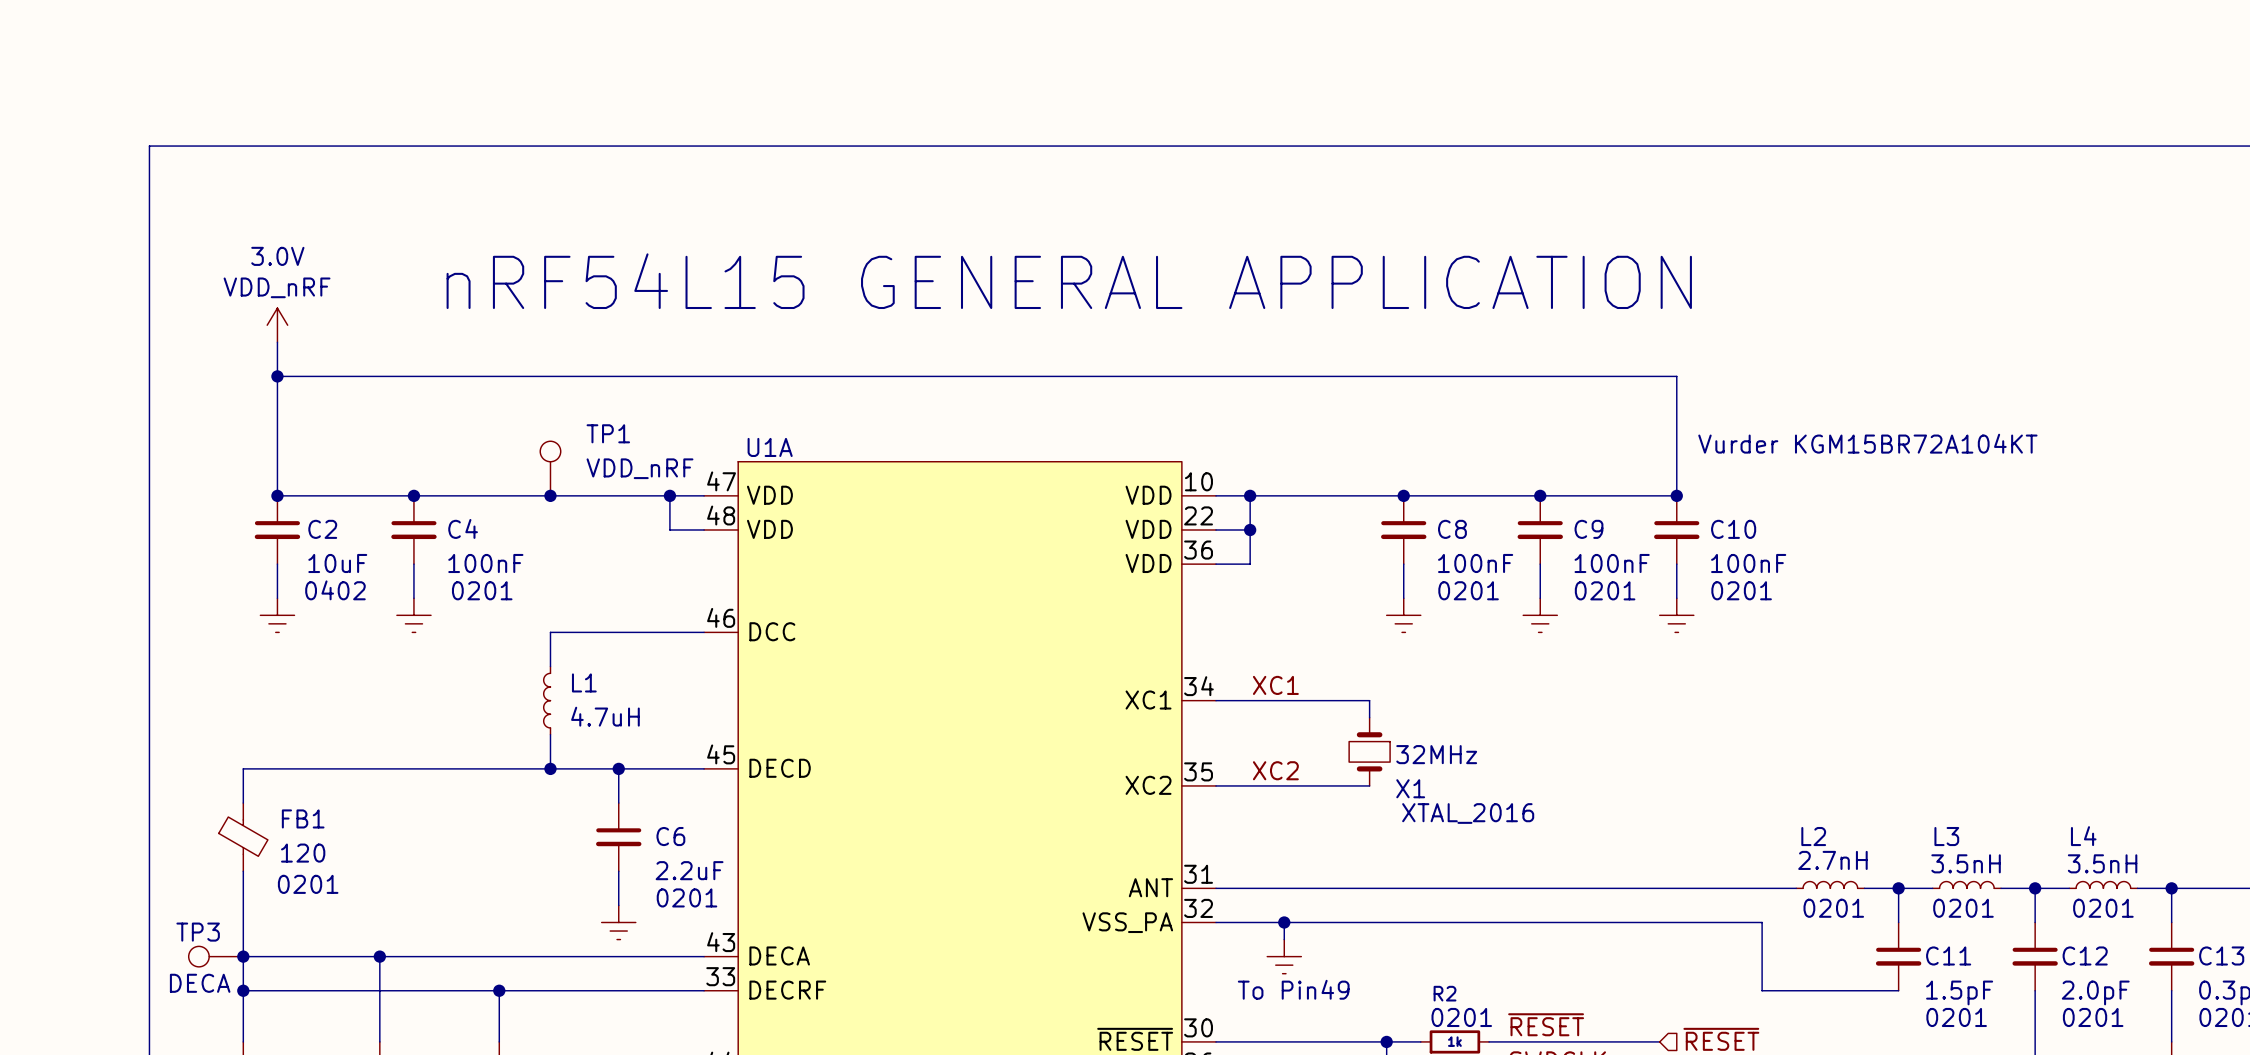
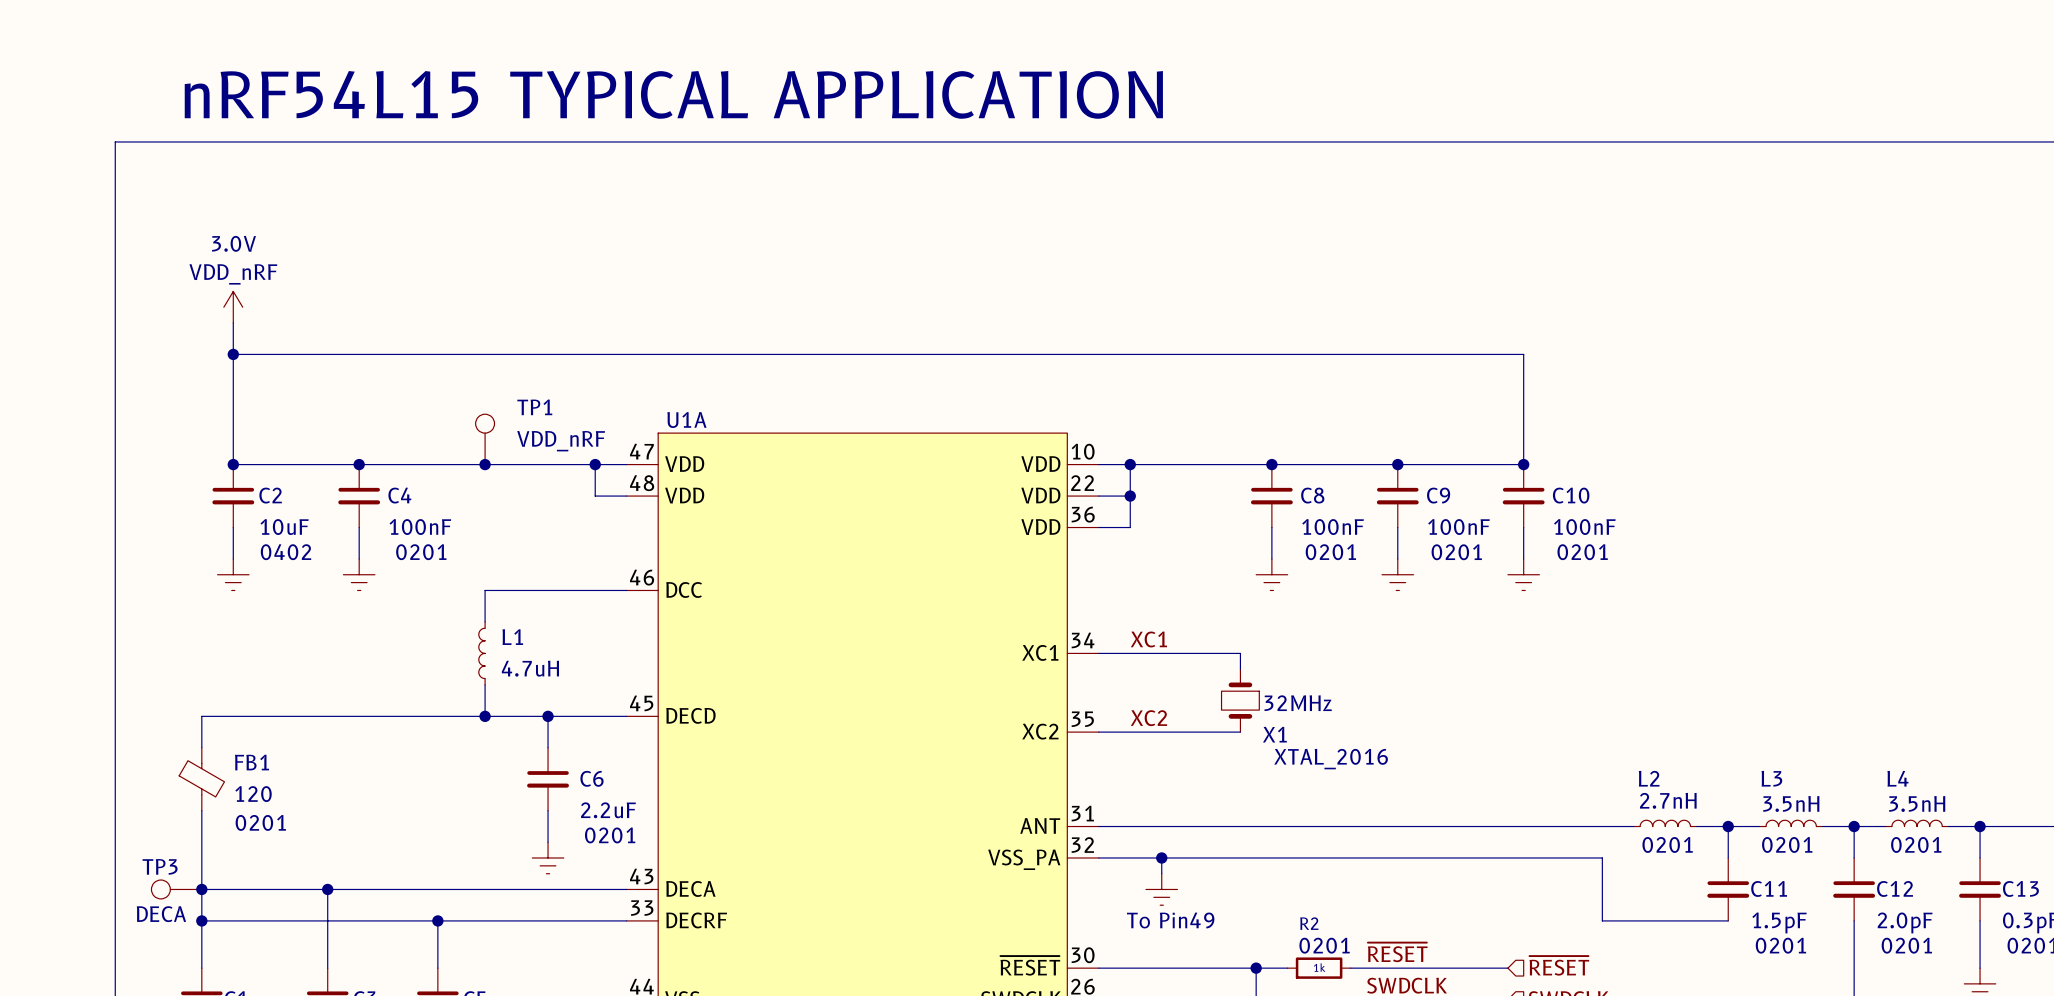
text: none -> nRF54L15 TYPICAL APPLICATION (673, 94)
text: nRF54L15 GENERAL APPLICATION (1069, 281) -> none
text: Vurder KGM15BR72A104KT (1867, 443) -> none

